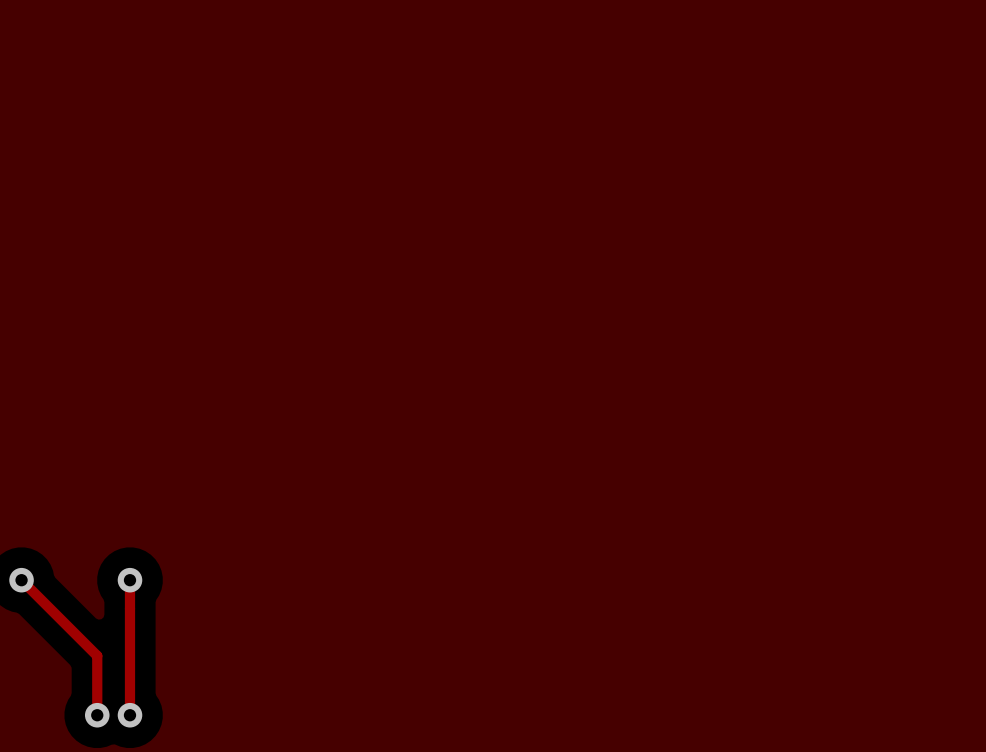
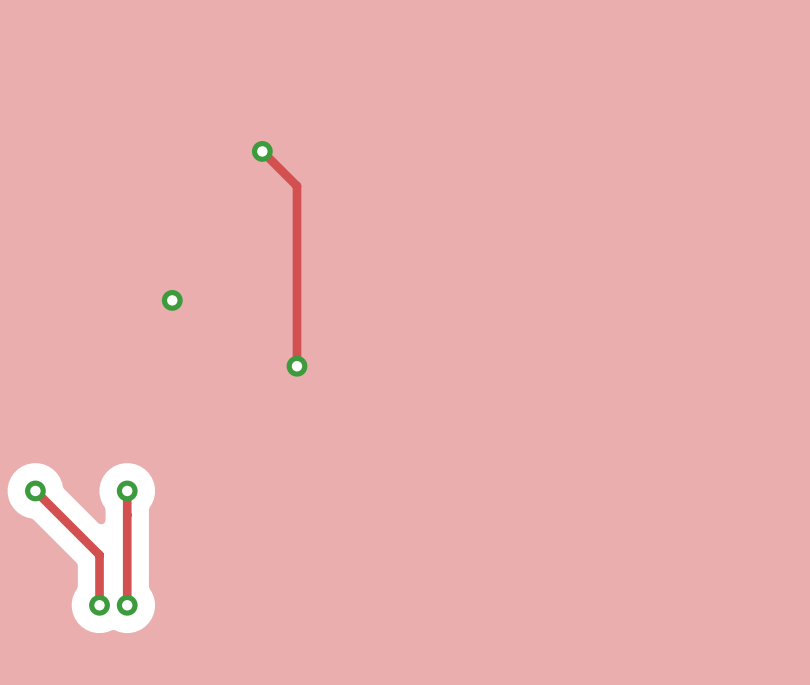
track: none -> (262, 151) (296, 186) (296, 366)
via: none -> (262, 151)
via: none -> (172, 300)
via: none -> (296, 366)

